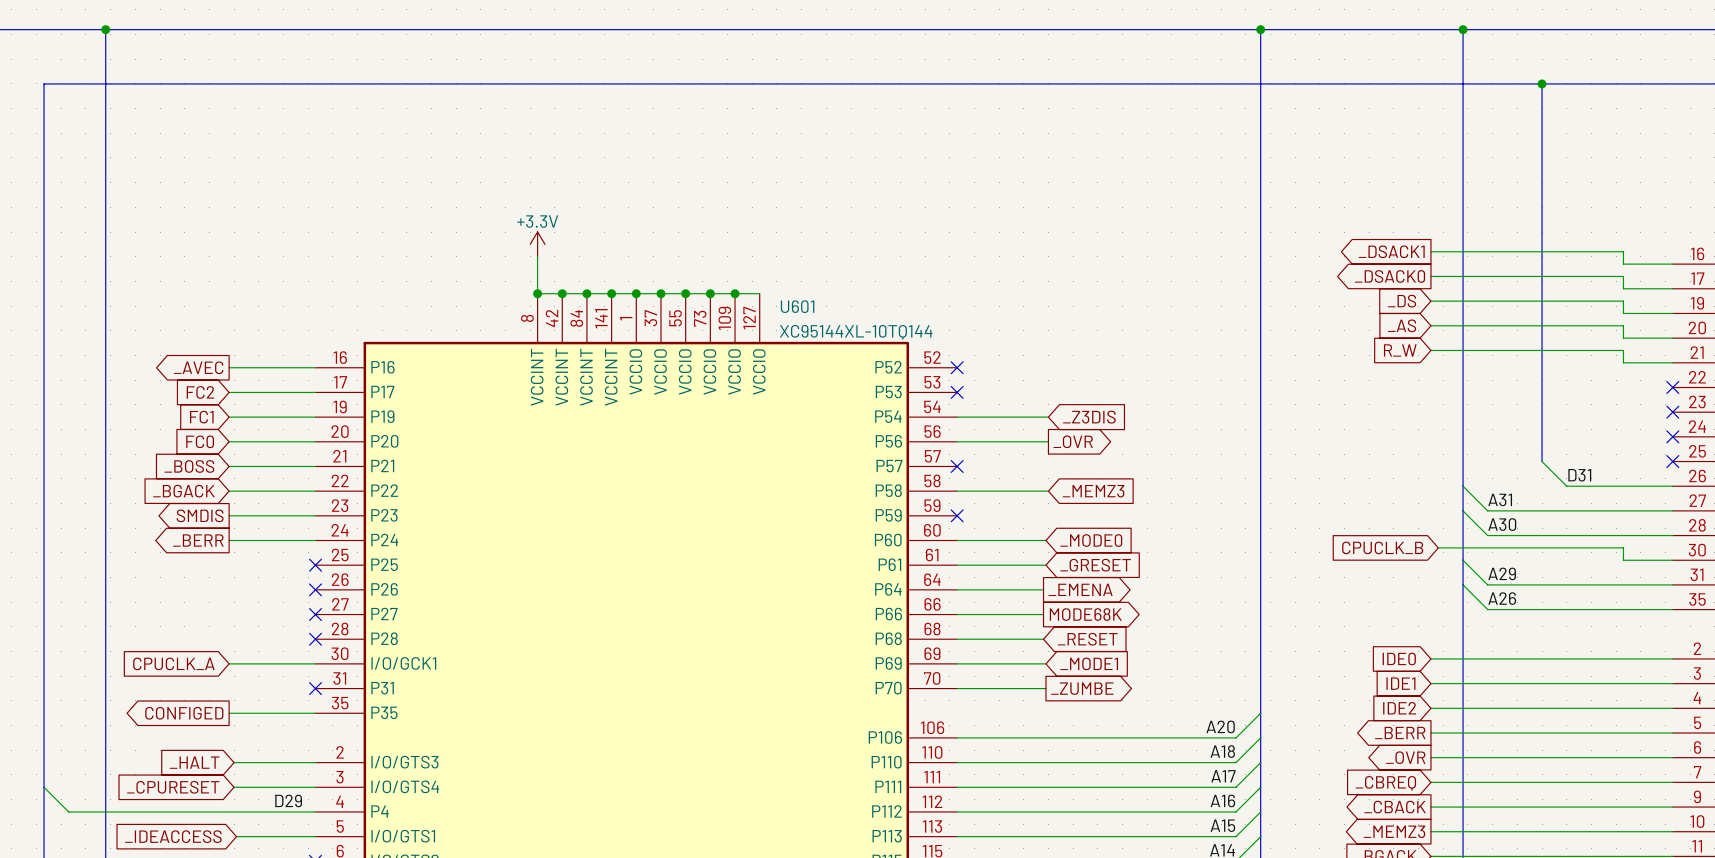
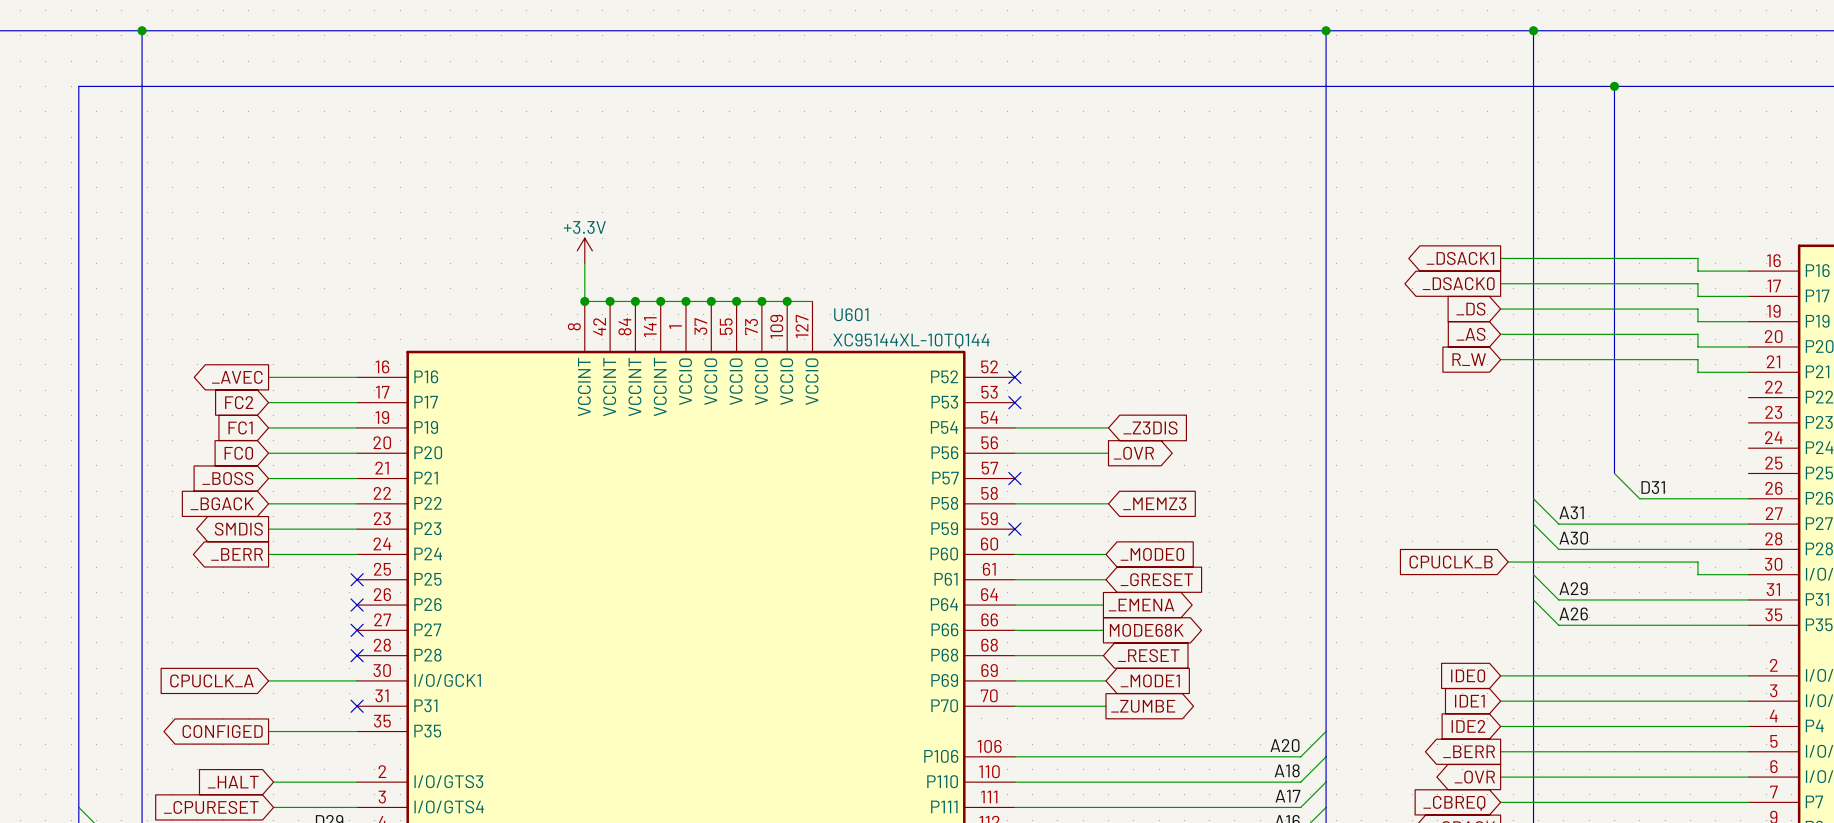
no-connect mark: (1672, 387) -> none
no-connect mark: (1672, 412) -> none
no-connect mark: (1672, 436) -> none
no-connect mark: (1672, 461) -> none

